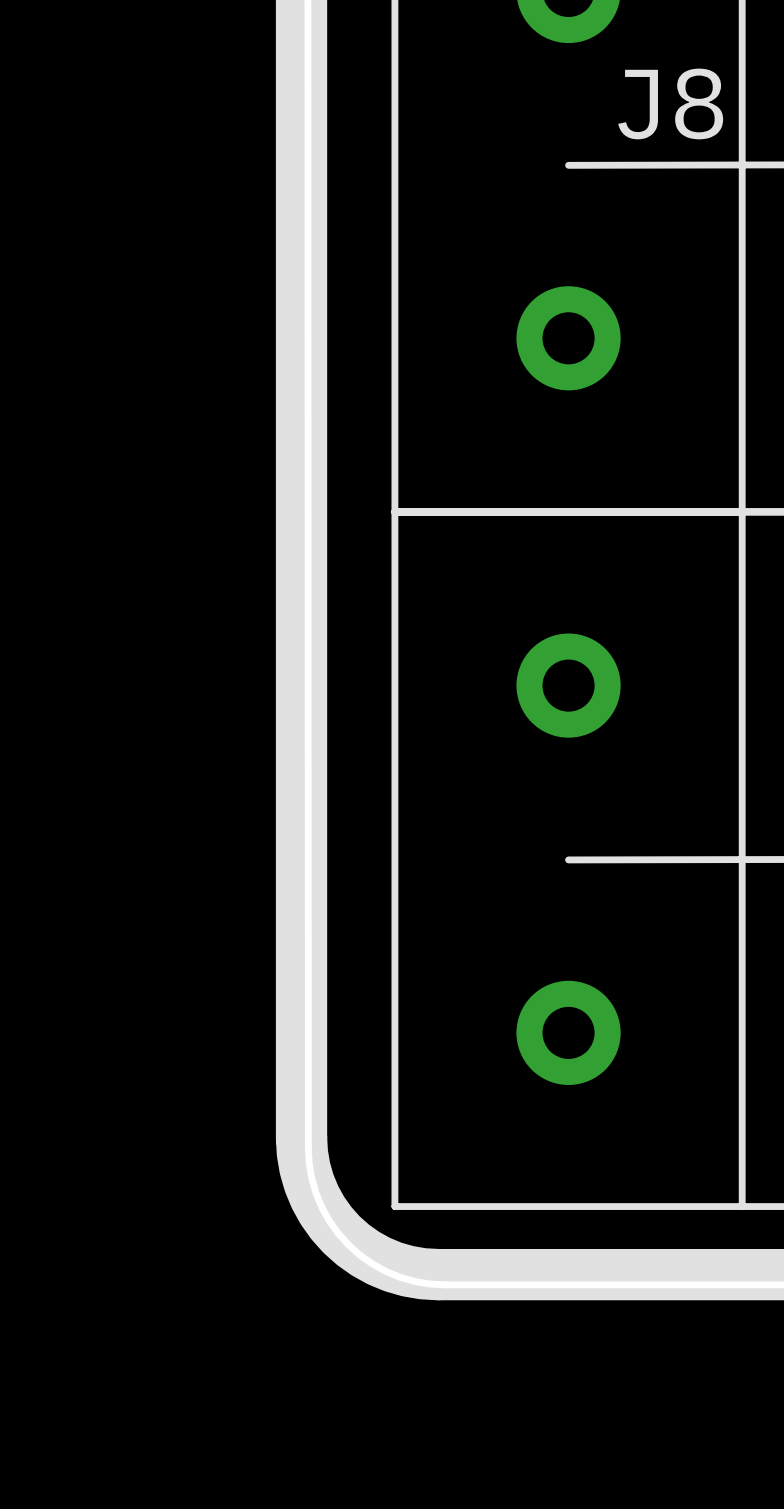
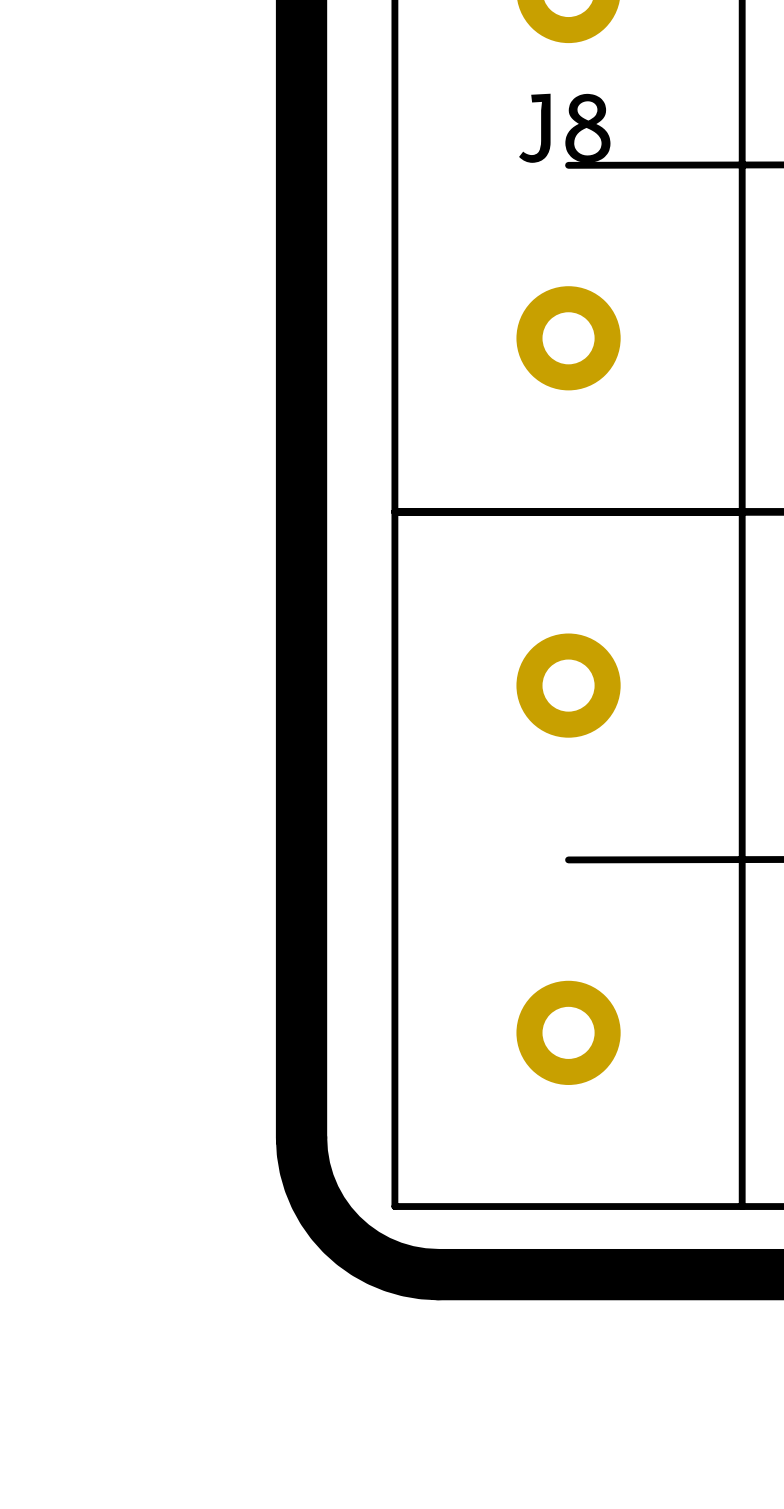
J8 name position: J8 (670, 103) -> J8 (564, 128)

